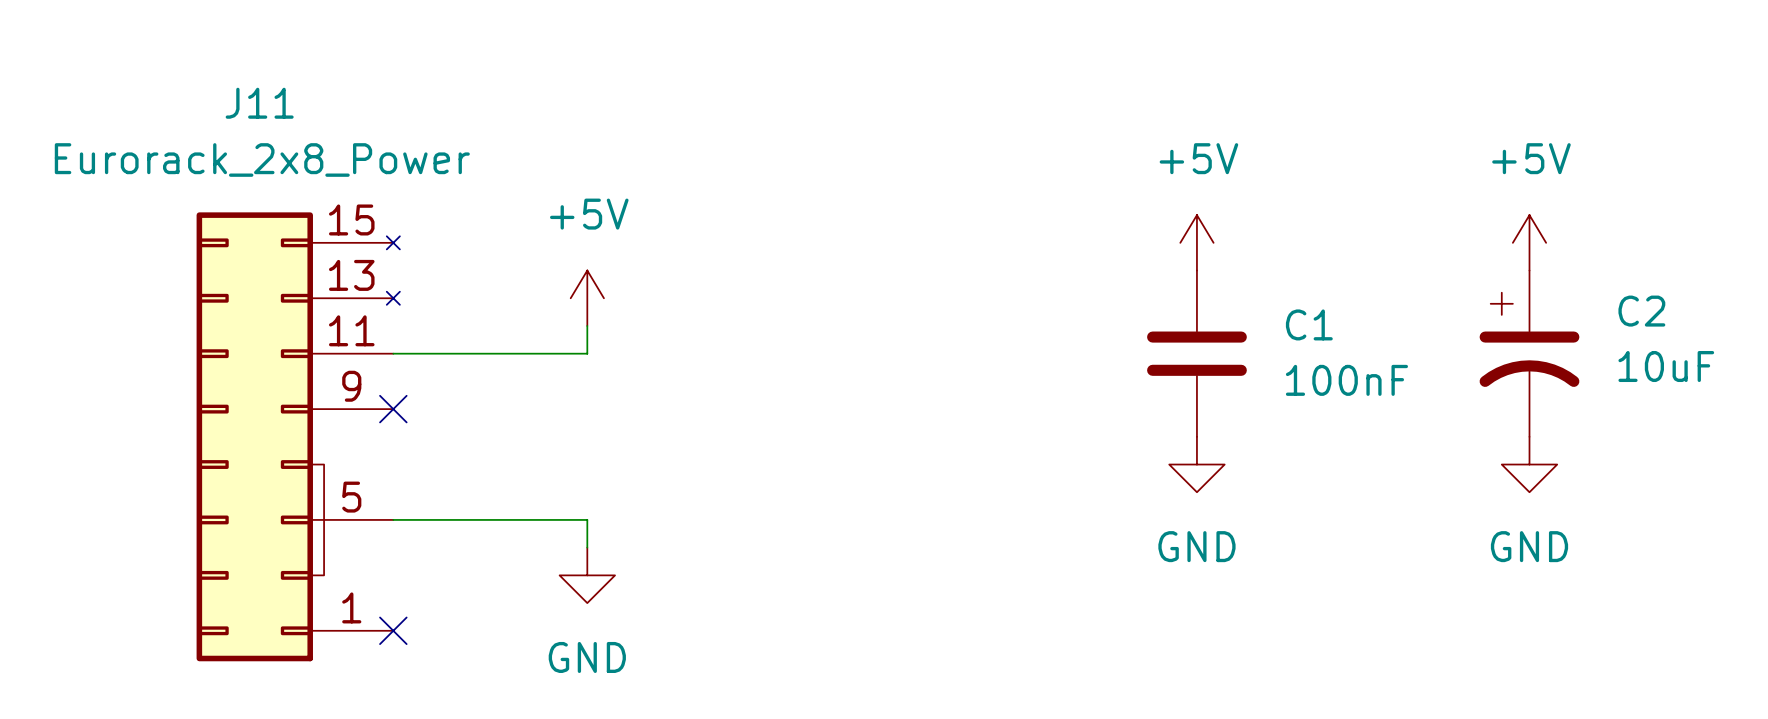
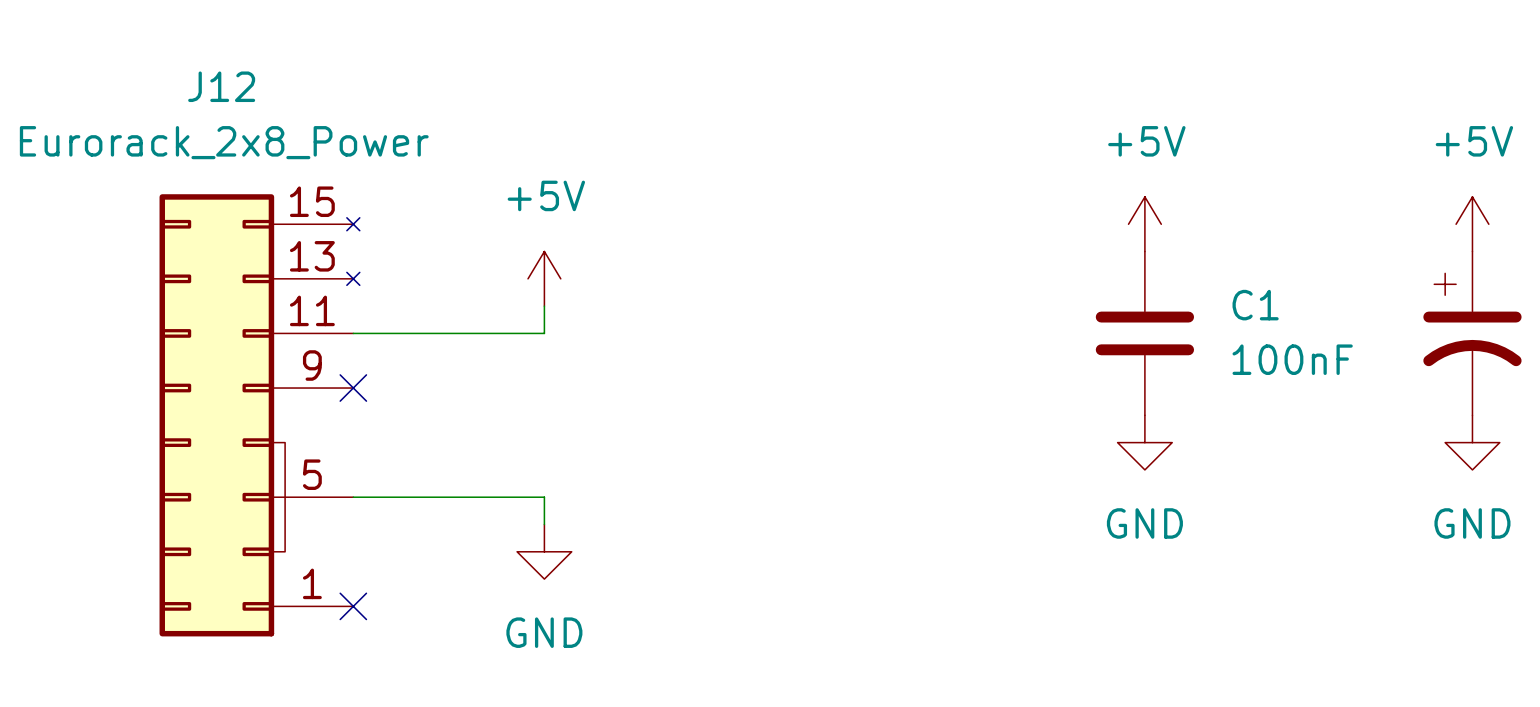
J11 name: J11 (259, 103) -> J12 (221, 86)

